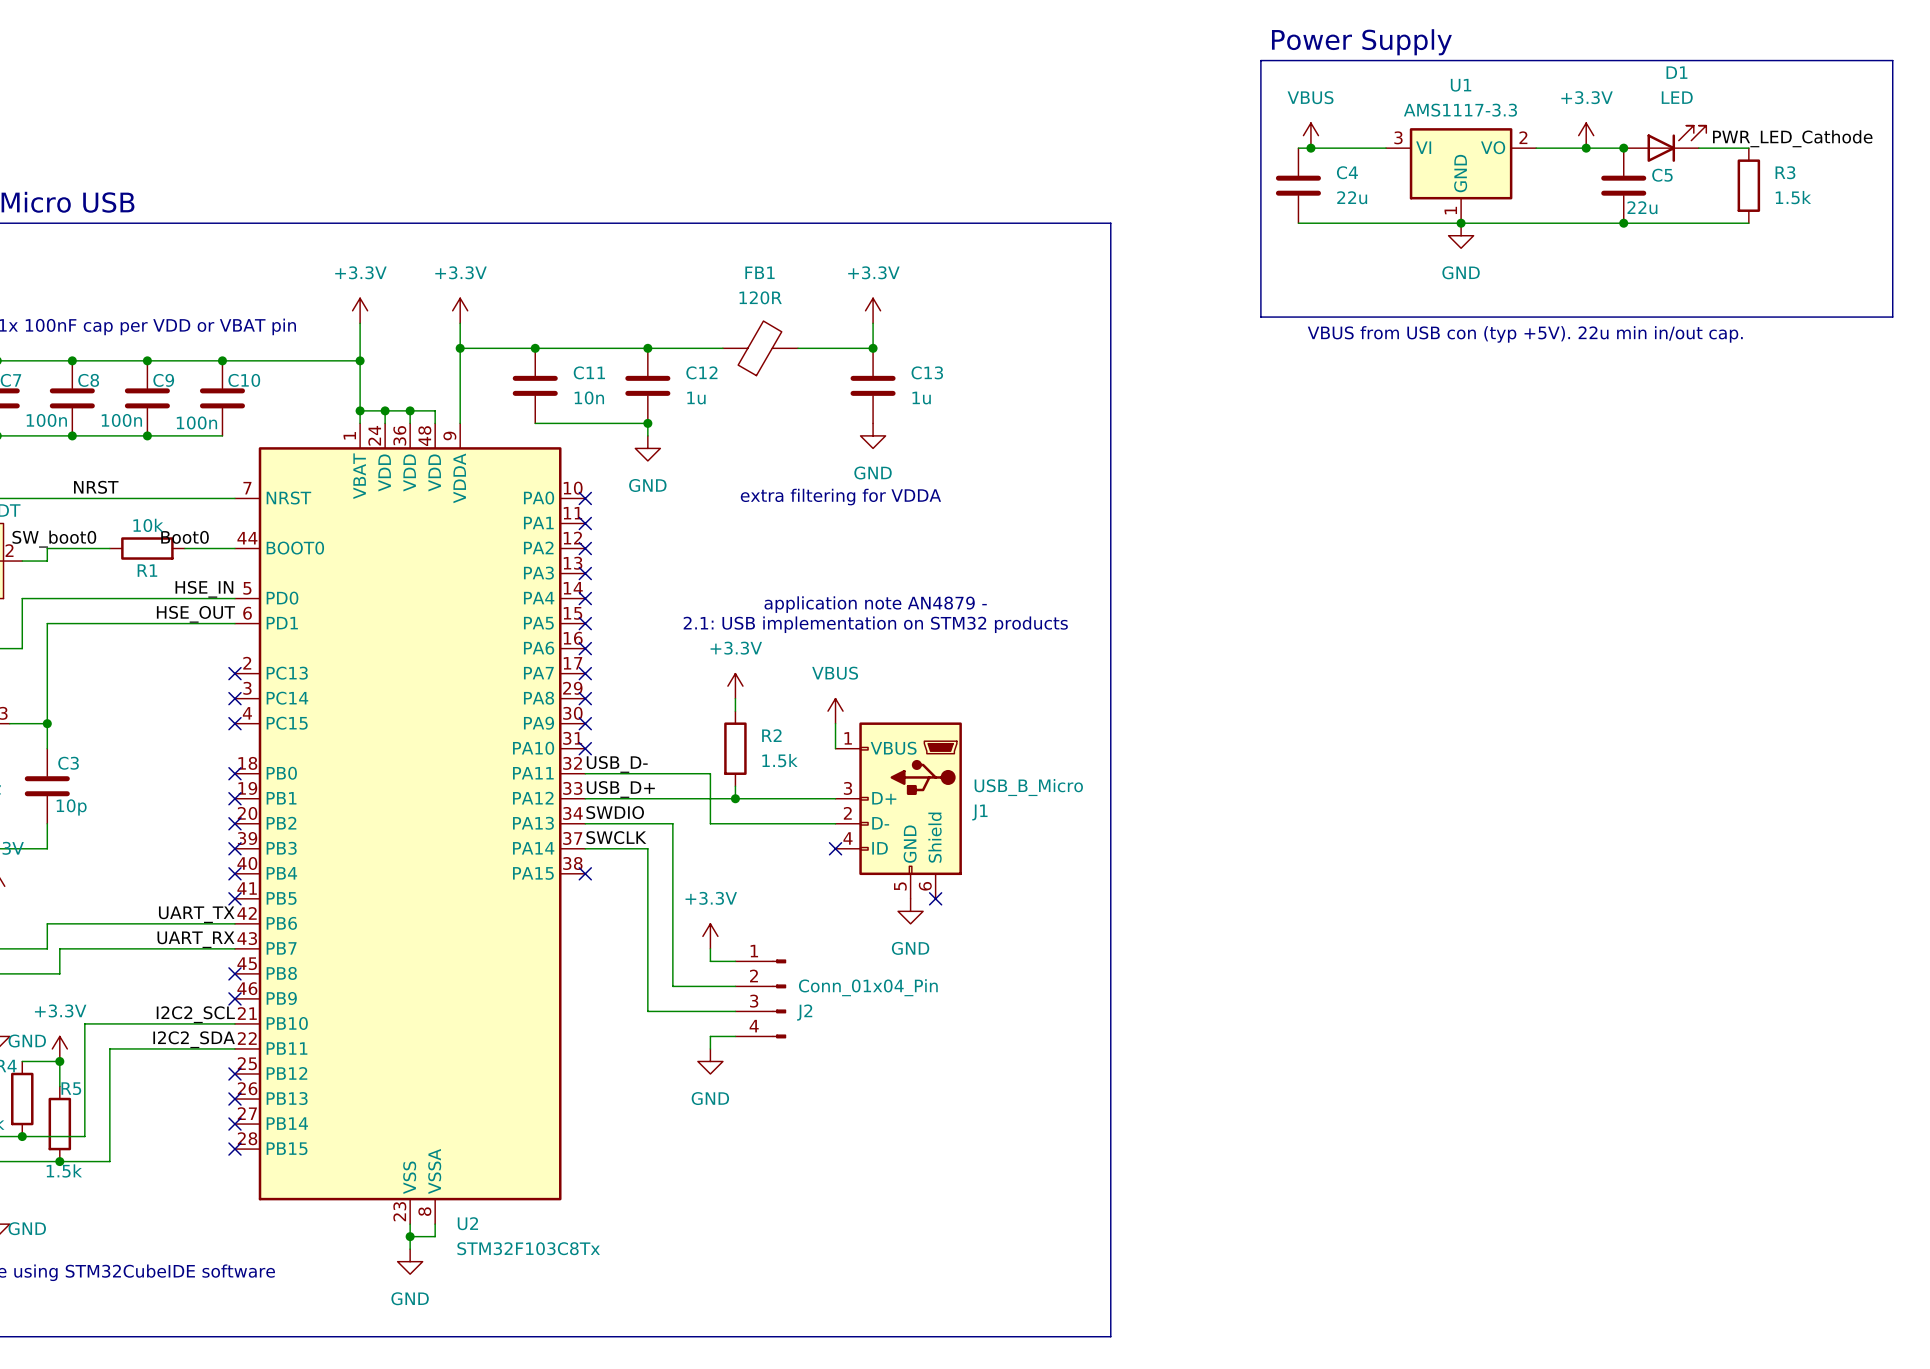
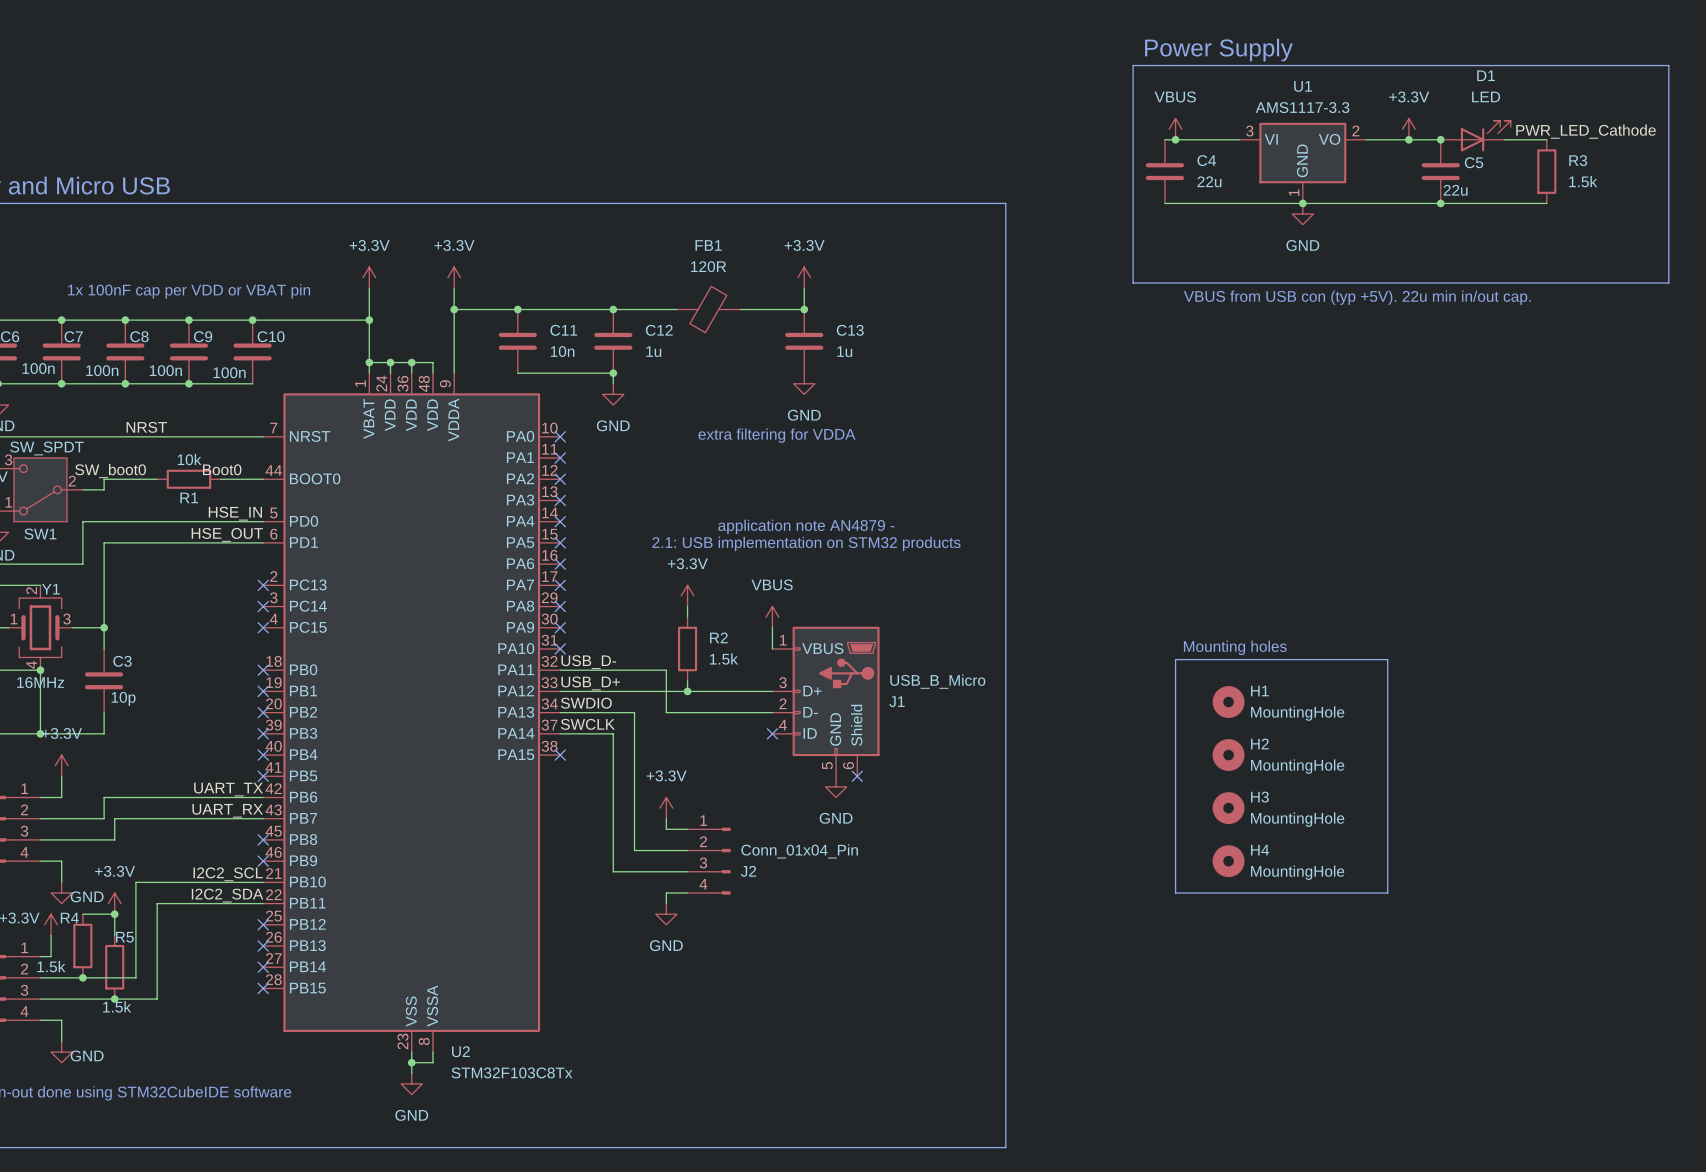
text: none -> Mounting holes (1235, 647)
line: none -> (1175, 659) (1387, 659) (1387, 892) (1175, 892) (1175, 659)
H1: none -> MountingHole (1228, 702)
H2: none -> MountingHole (1228, 755)
H3: none -> MountingHole (1228, 808)
H4: none -> MountingHole (1228, 861)

